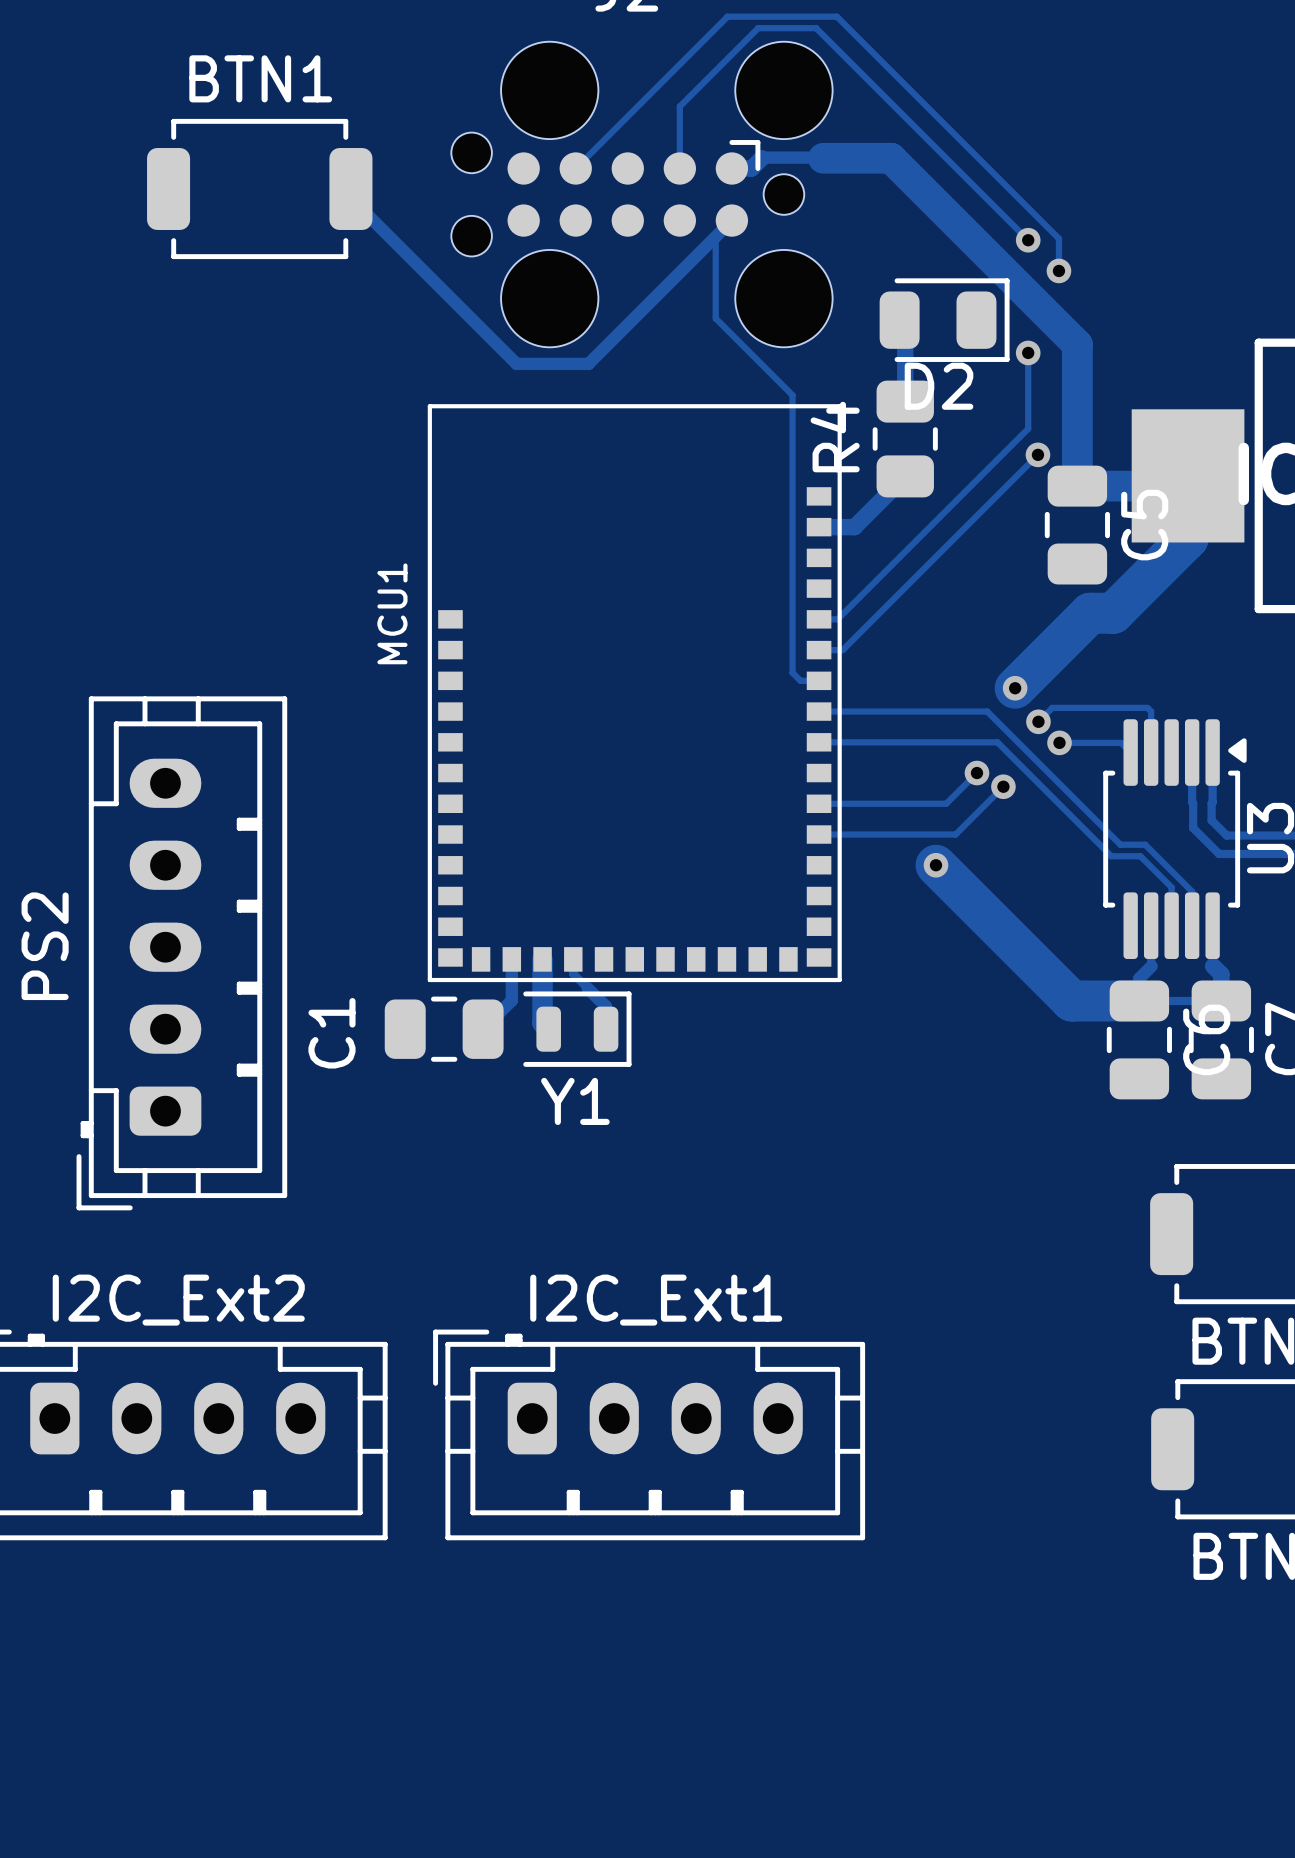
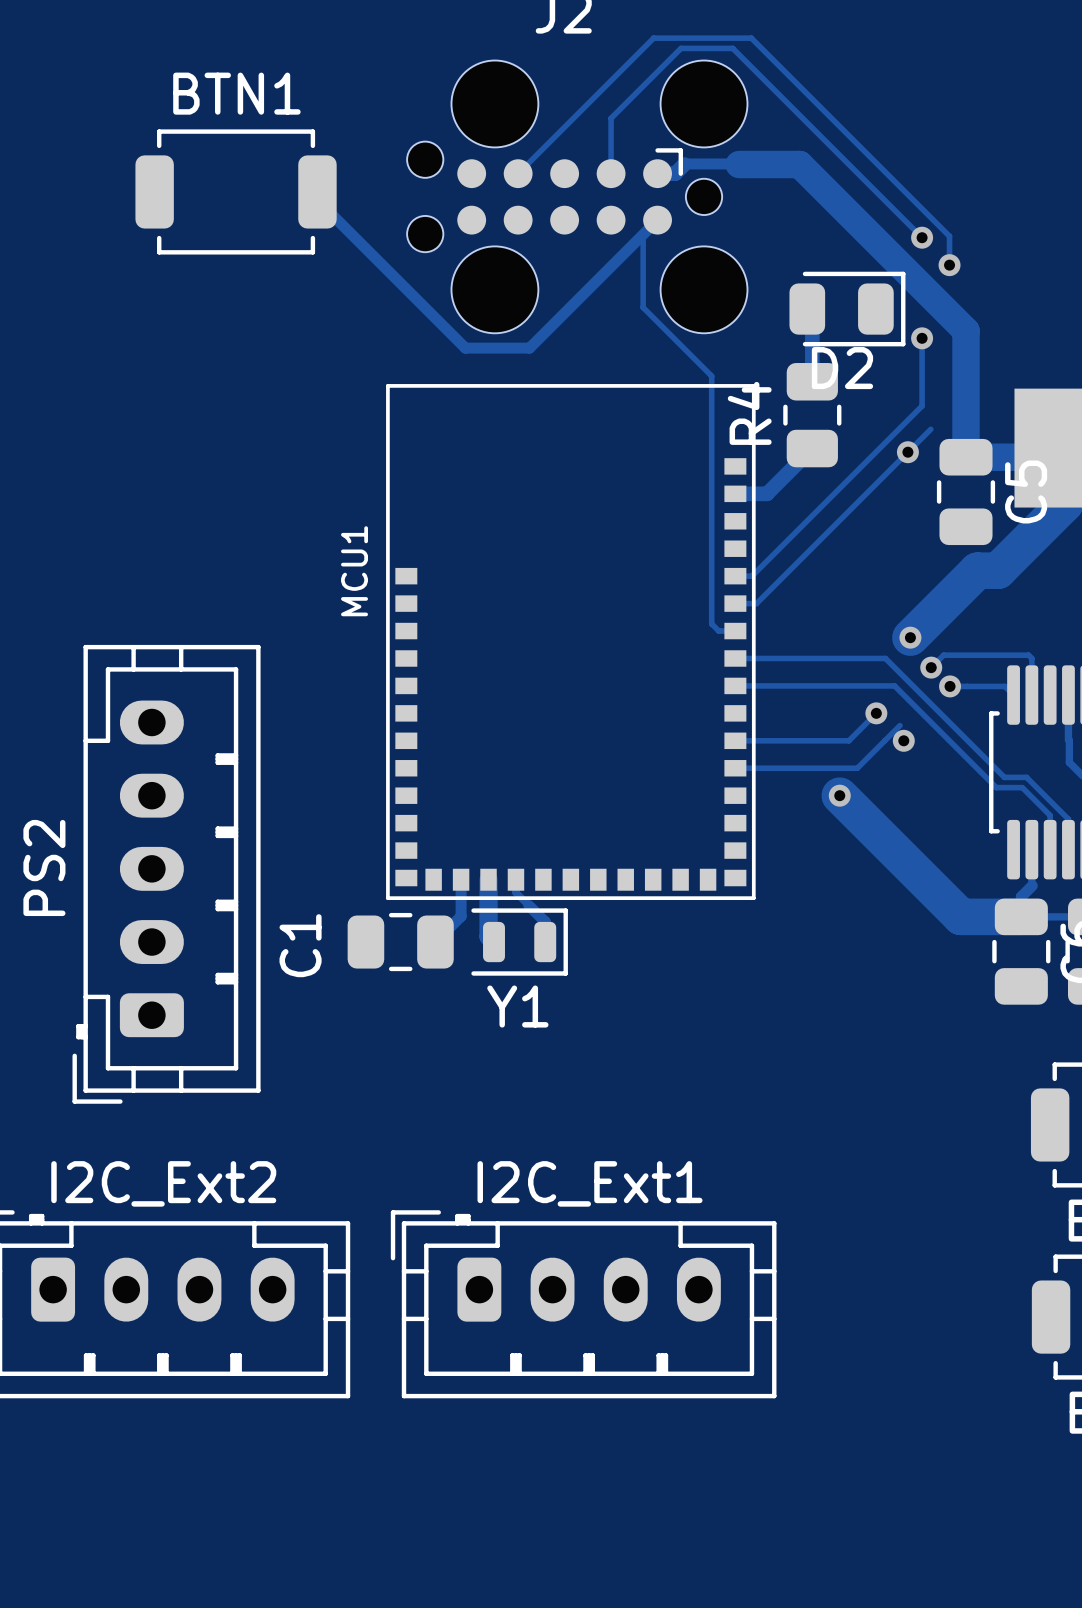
via position: (1037, 454) -> (907, 452)
via position: (1003, 786) -> (903, 740)

